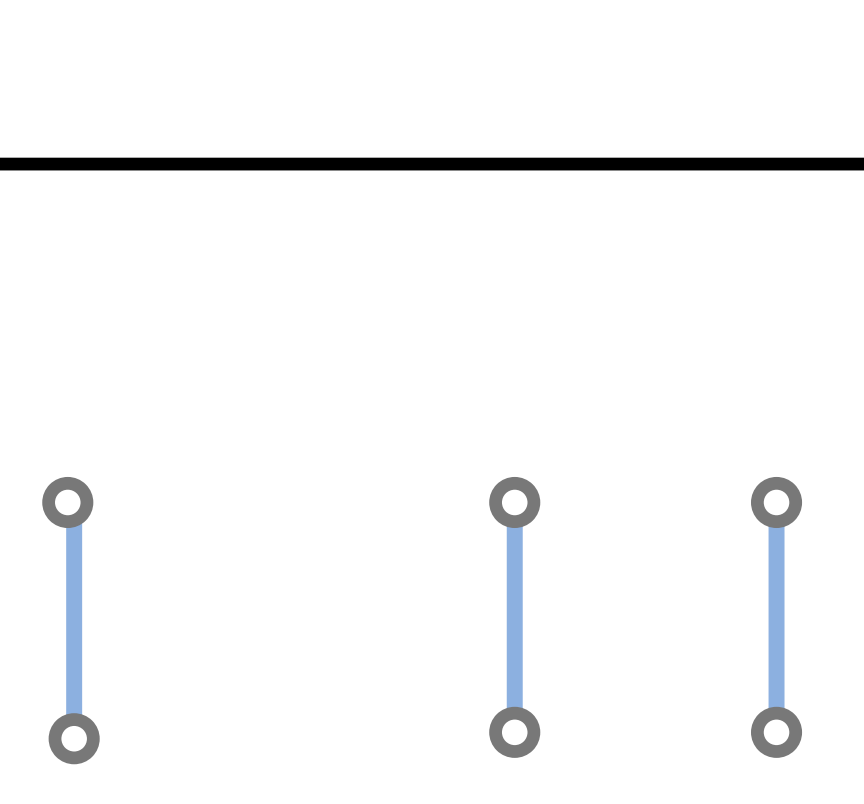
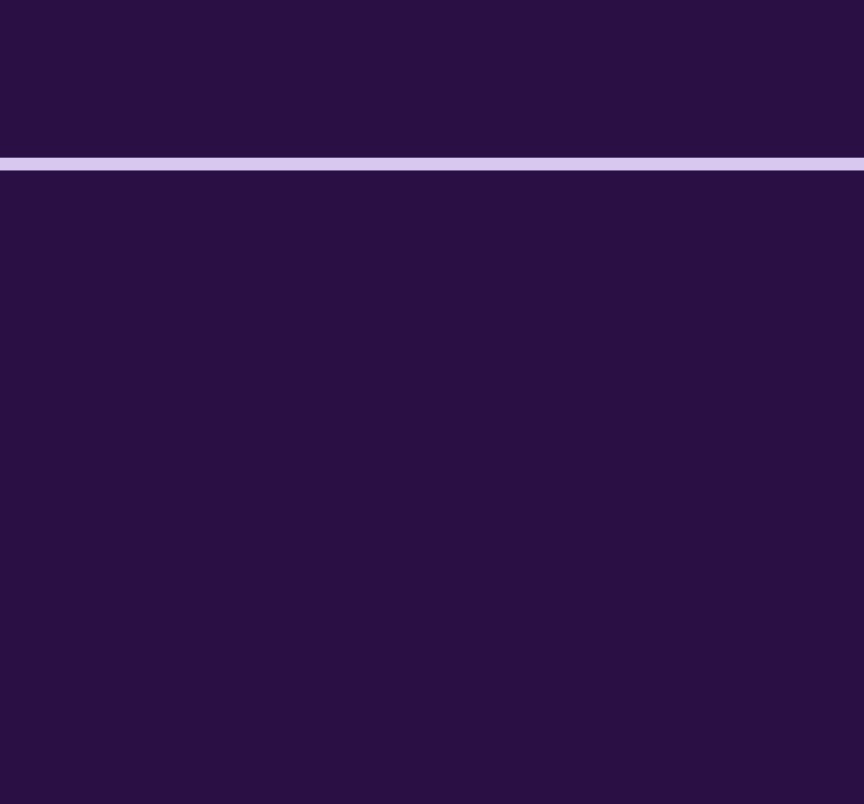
track: (67, 502) (74, 508) (74, 738) -> none
via: (67, 502) -> none
track: (514, 502) (514, 732) -> none
via: (514, 502) -> none
track: (776, 502) (776, 732) -> none
via: (776, 502) -> none
via: (514, 732) -> none
via: (776, 732) -> none
via: (74, 738) -> none

